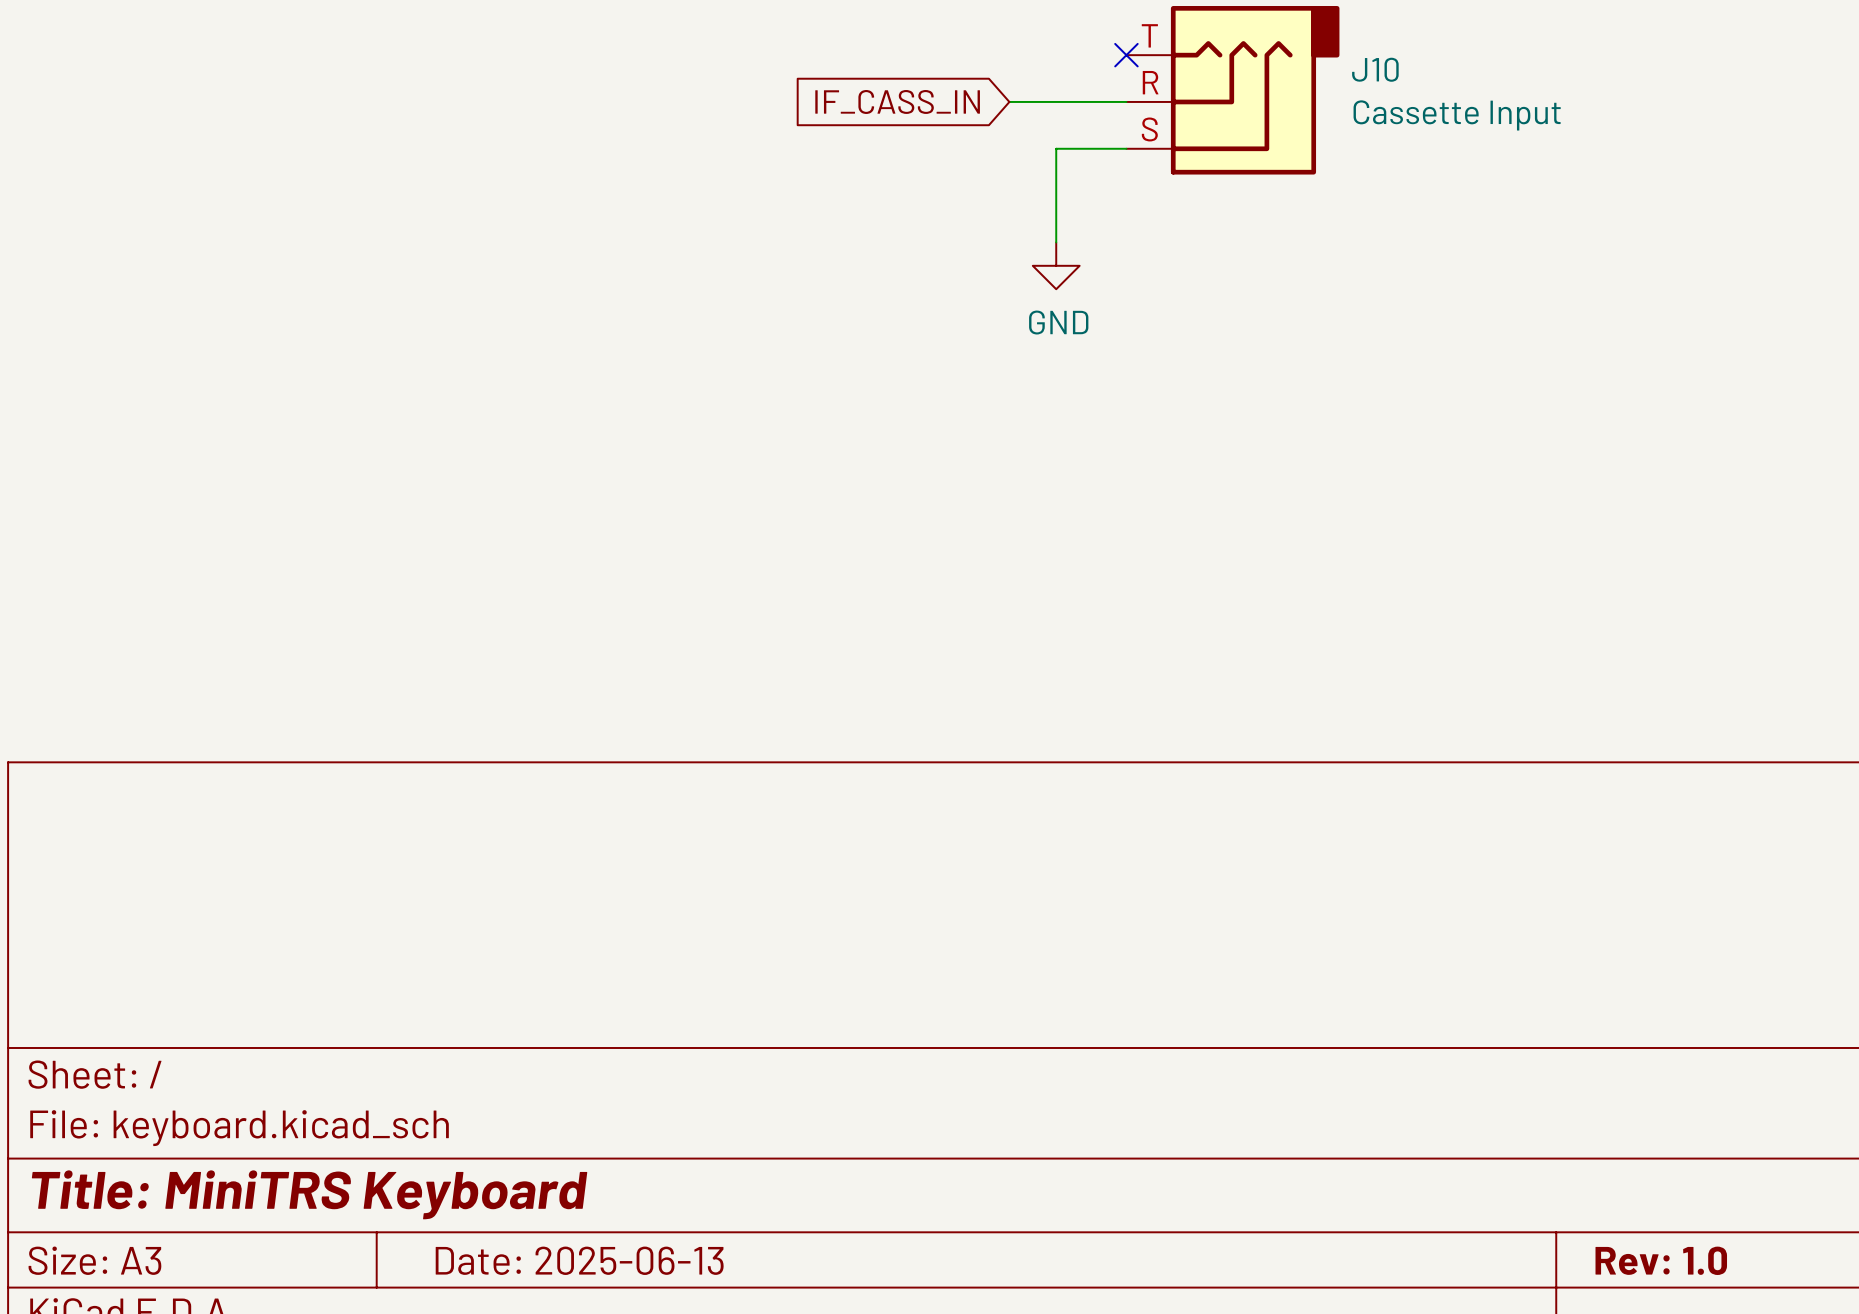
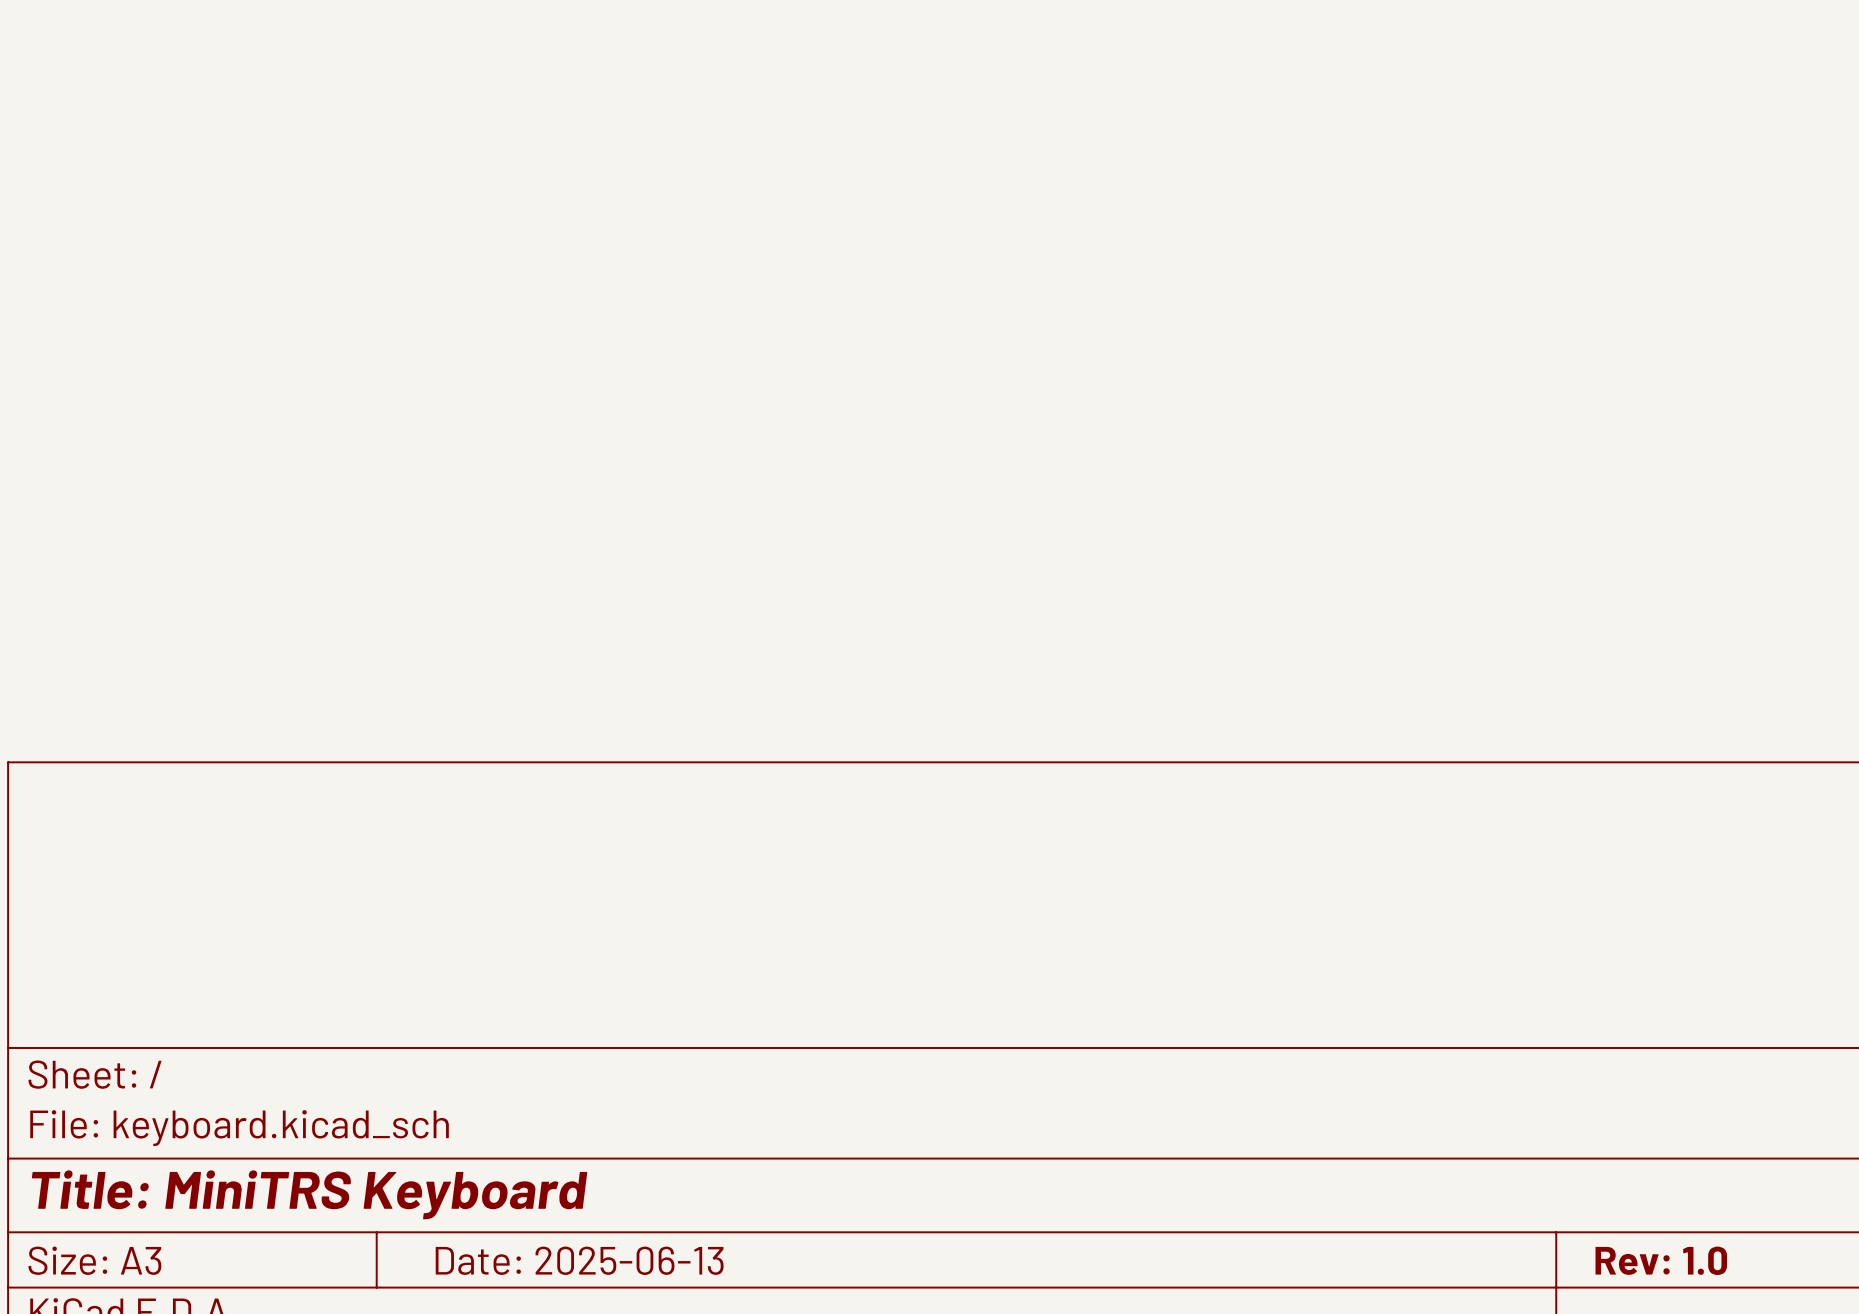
no-connect mark: (1126, 55) -> none
J10: Cassette Input (1232, 90) -> none
global label: IF_CASS_IN (897, 101) -> none
wire: (1009, 101) (1126, 101) -> none
wire: (1126, 148) (1056, 148) (1056, 242) -> none
power symbol: GND (1056, 265) -> none

